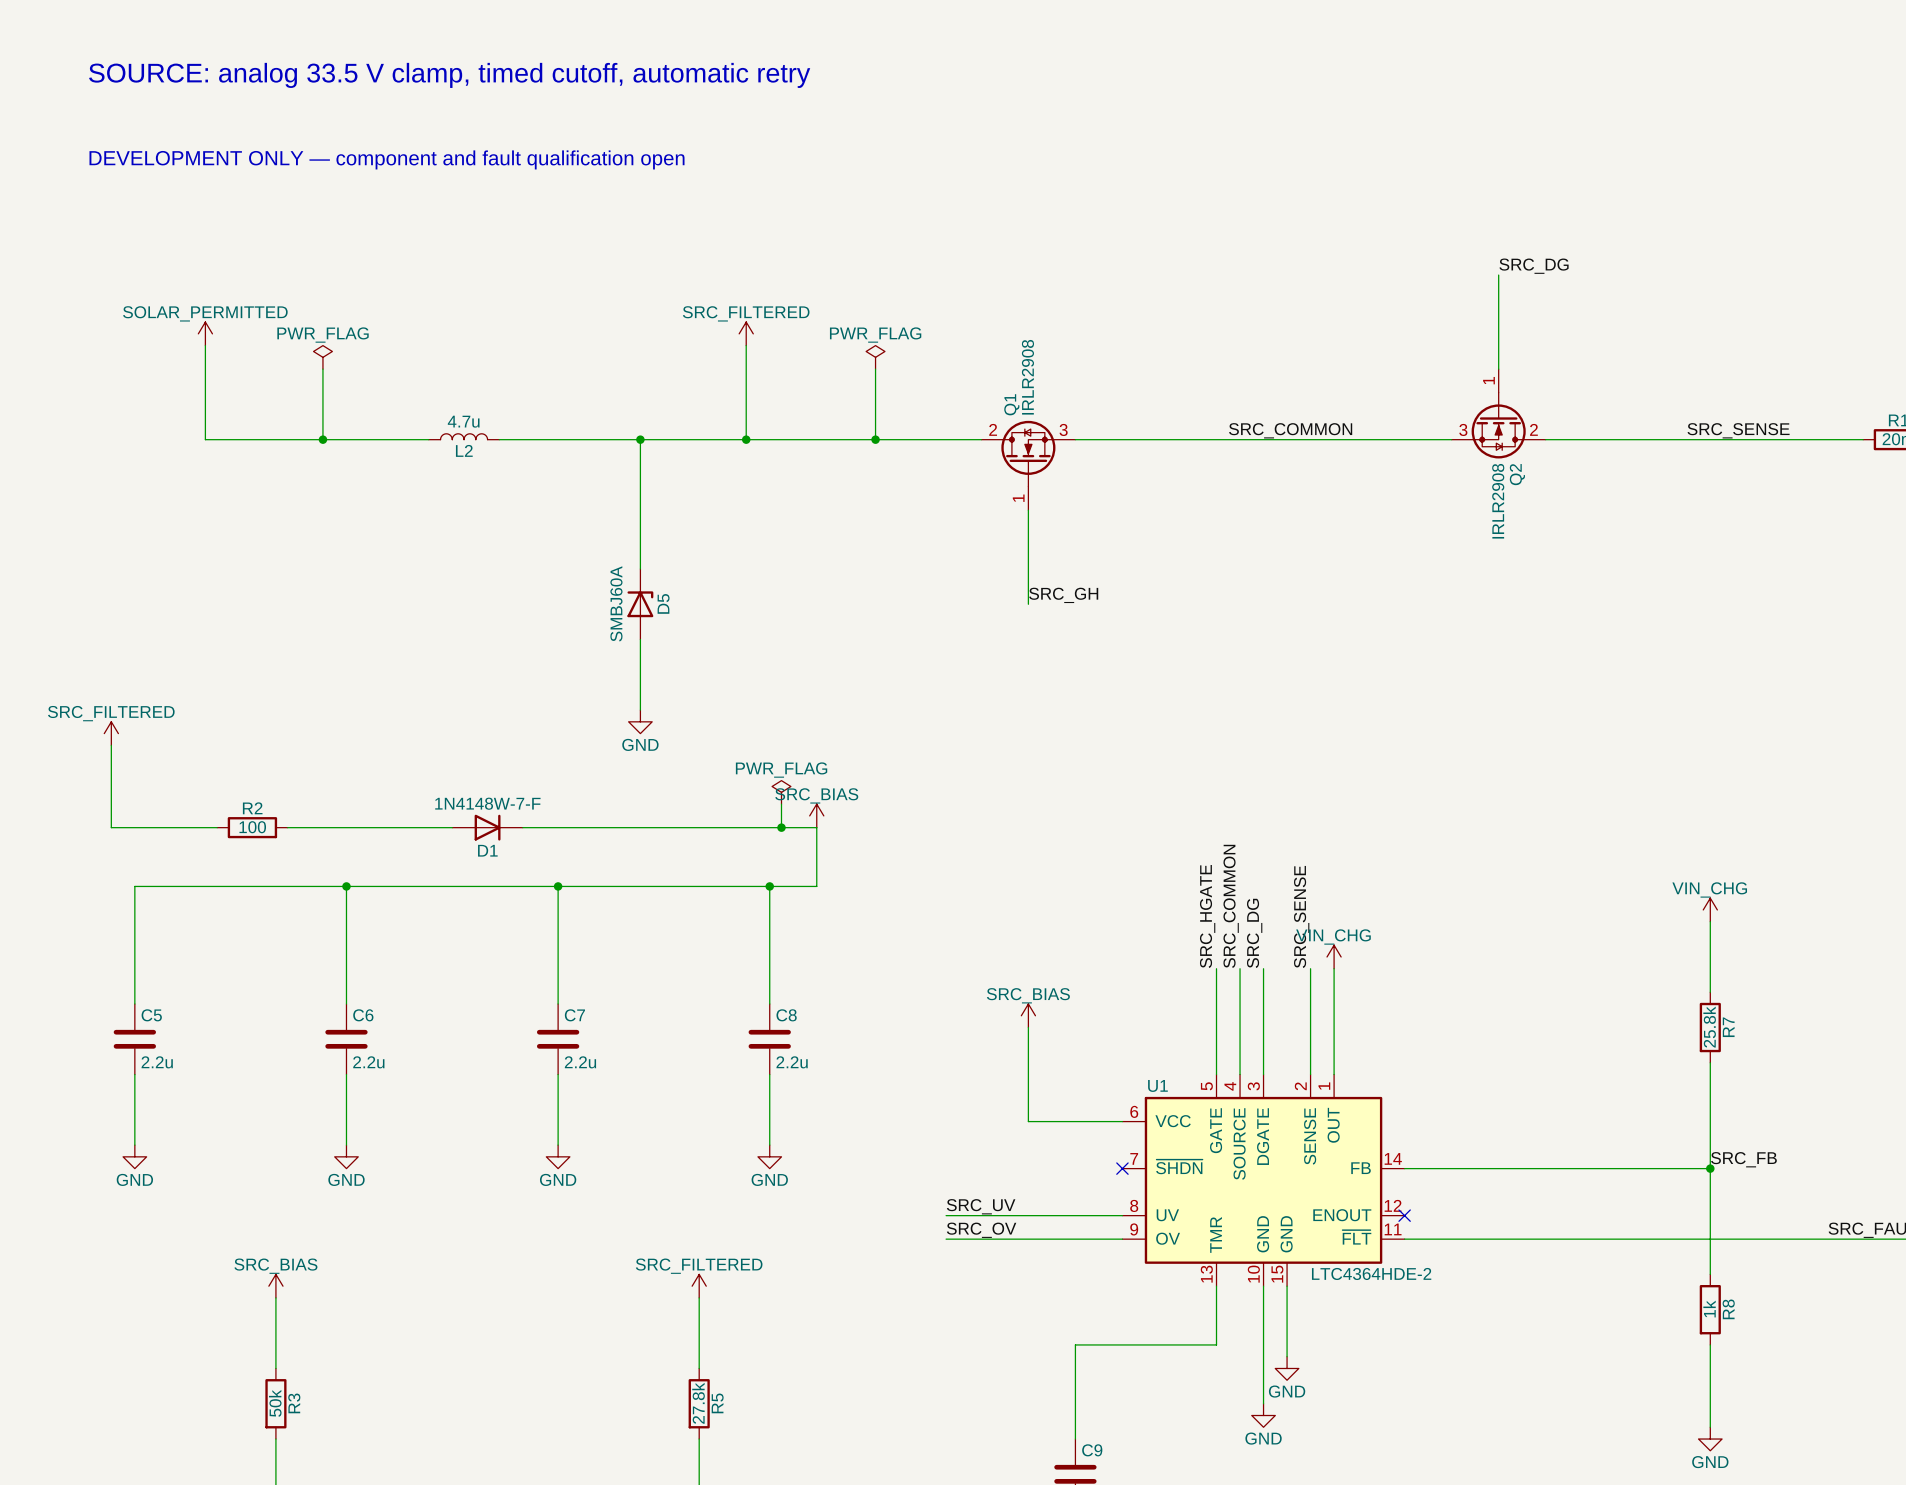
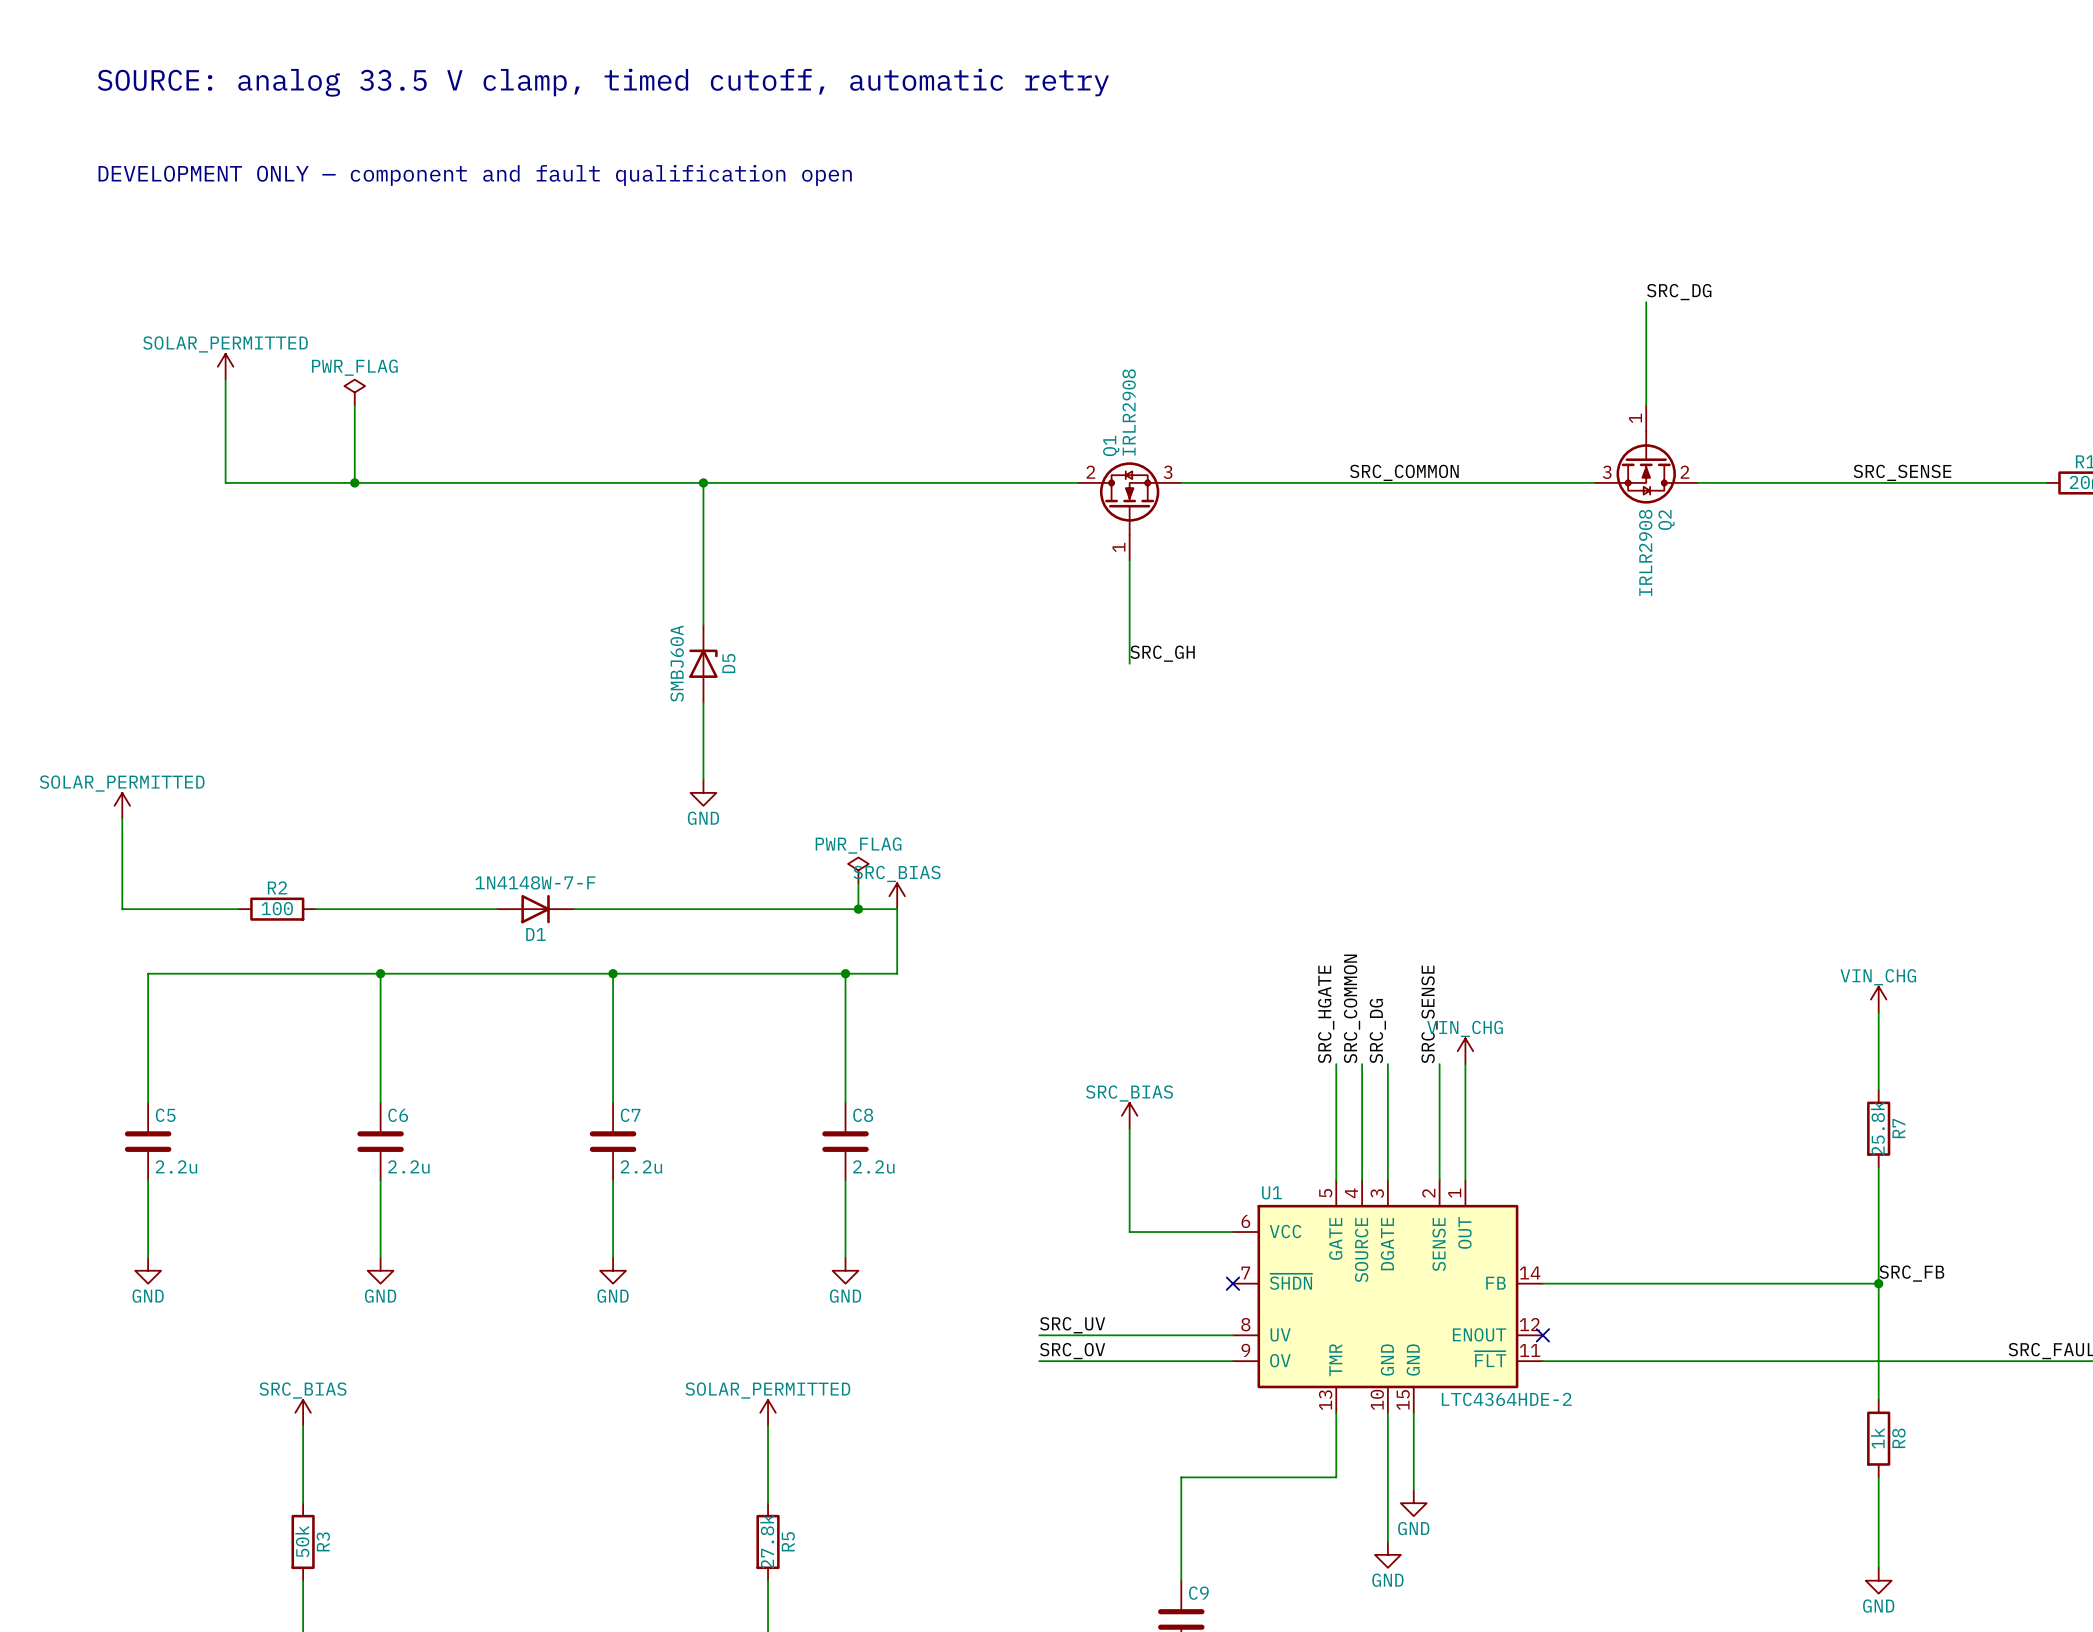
power symbol: SRC_FILTERED (746, 333) -> none
wire: (746, 345) (746, 439) -> none
power symbol: PWR_FLAG (875, 357) -> none
wire: (875, 369) (875, 439) -> none
L2: 4.7u (464, 436) -> none
wire: none -> (470, 482) (548, 482)
junction: (746, 439) -> none
junction: (875, 439) -> none
power symbol: SRC_FILTERED (111, 733) -> SOLAR_PERMITTED (122, 805)
power symbol: SRC_FILTERED (699, 1286) -> SOLAR_PERMITTED (768, 1412)

